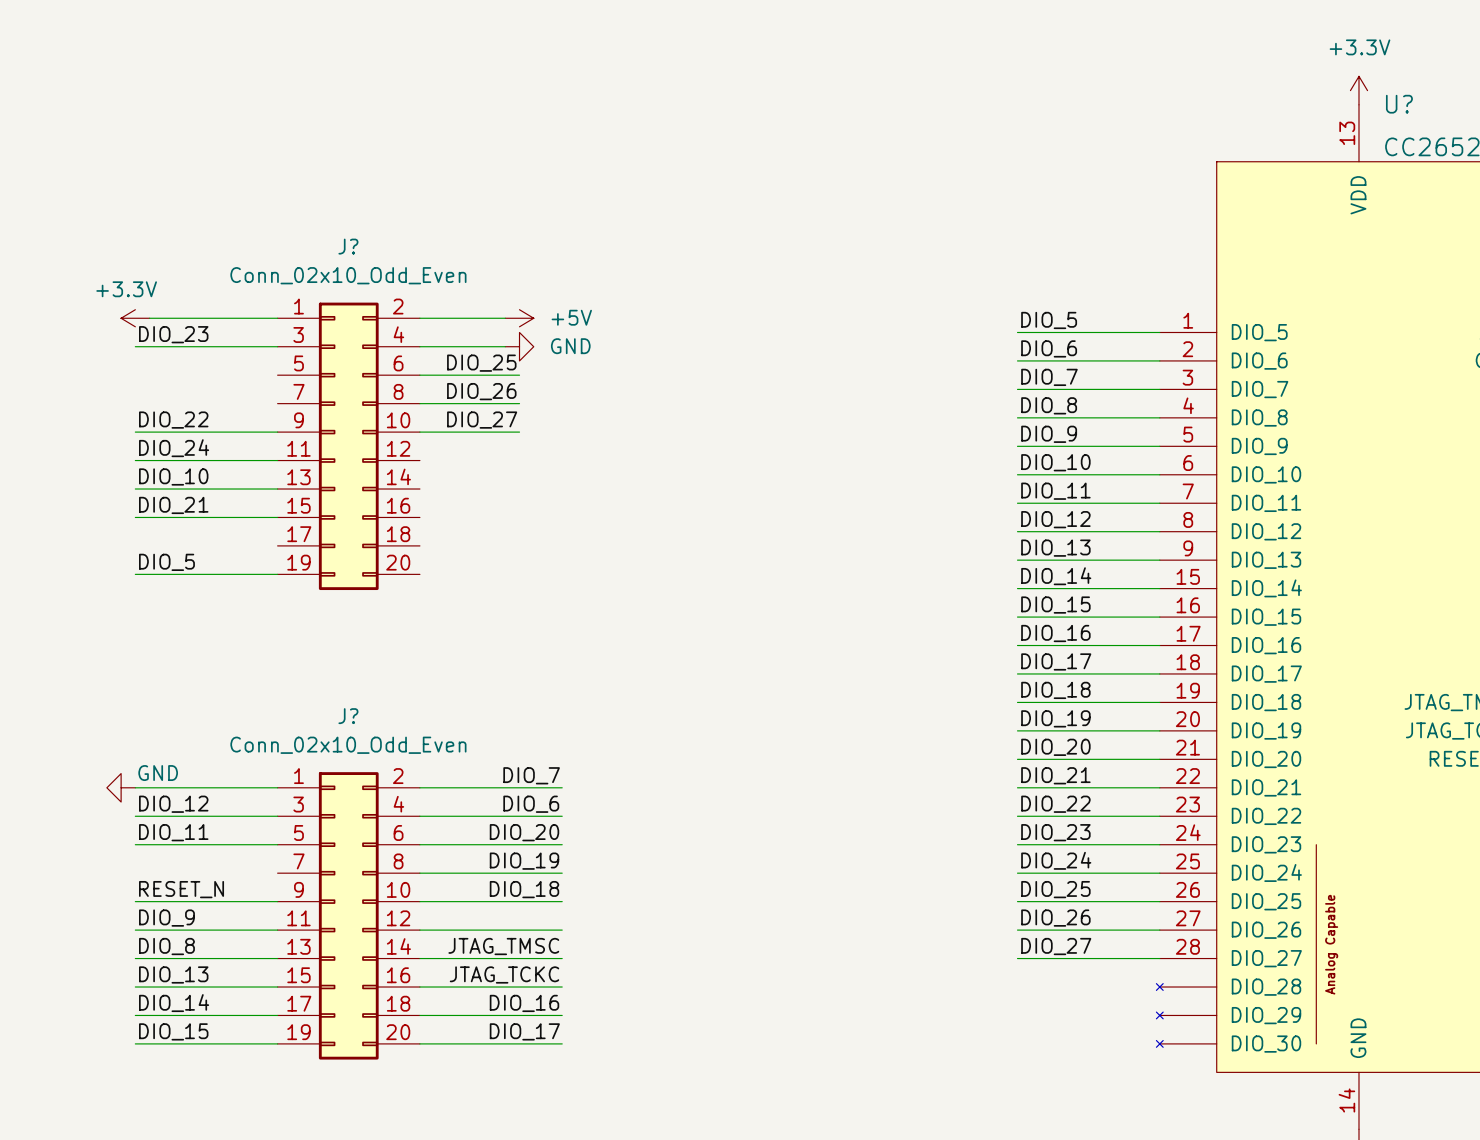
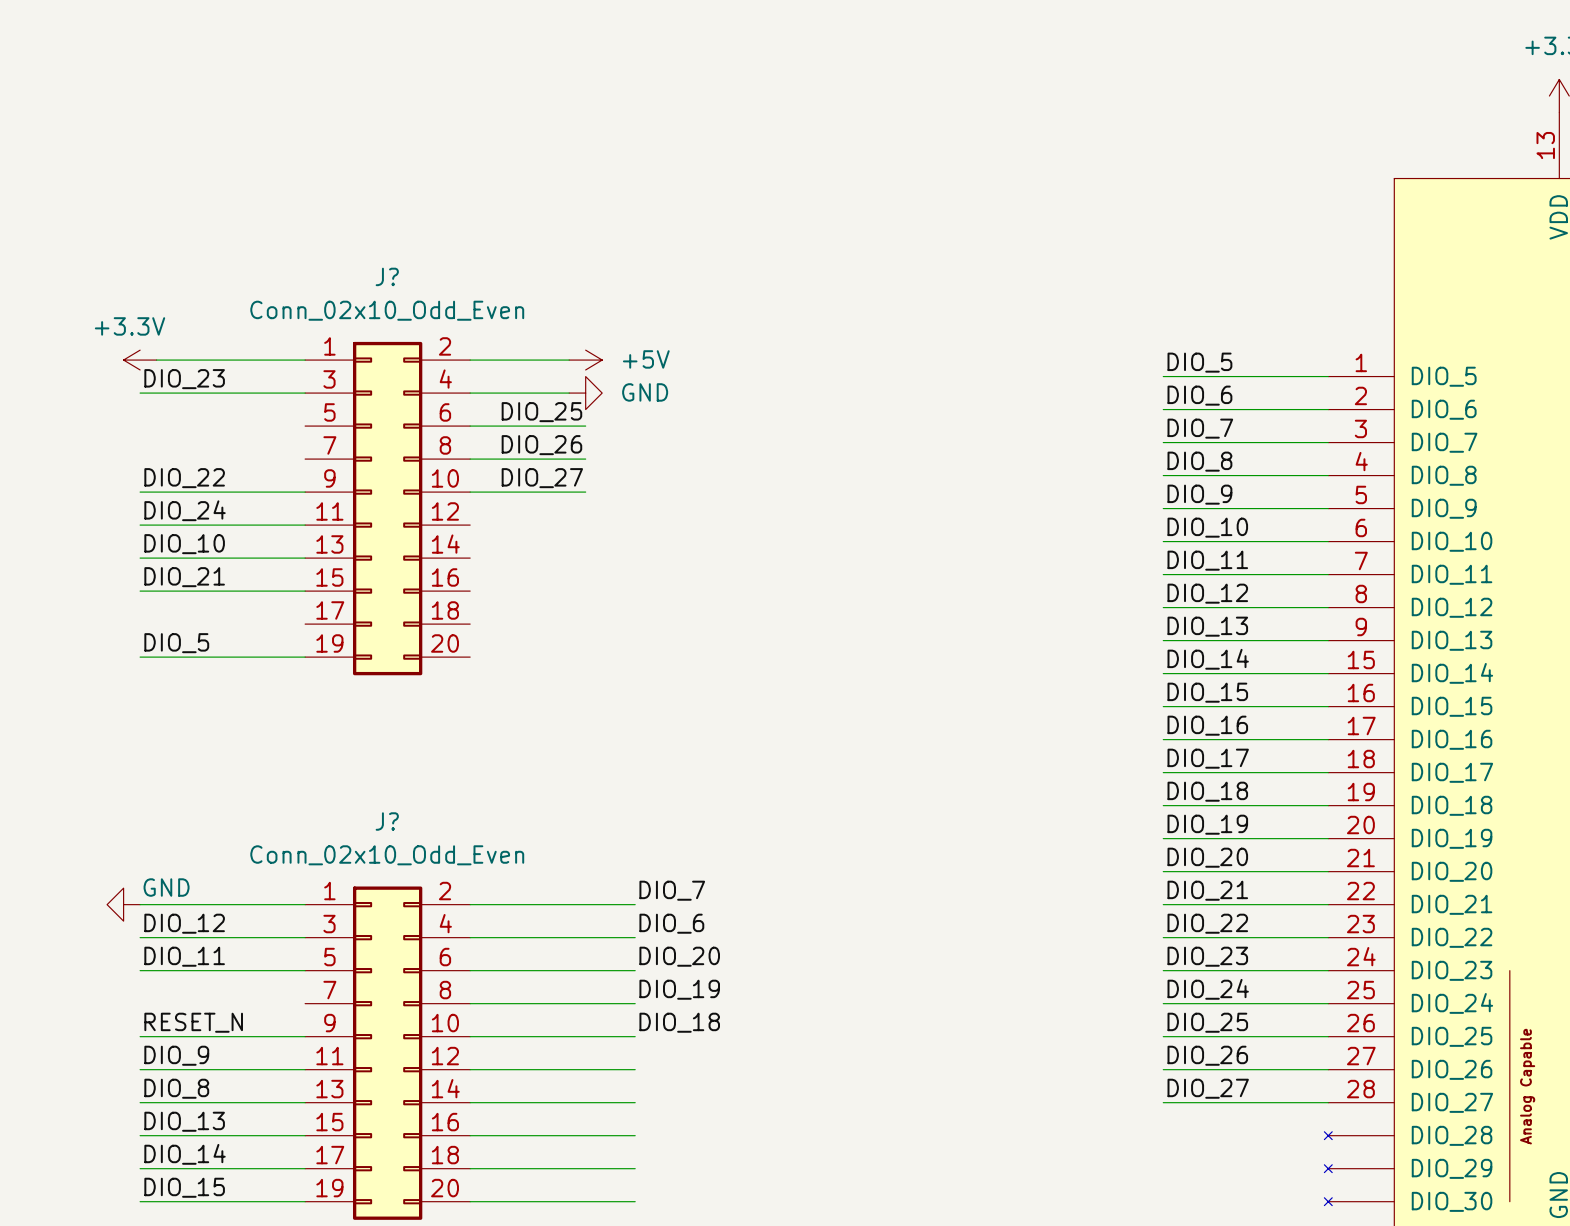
label position: DIO_7 (531, 775) -> DIO_7 (672, 890)
label position: DIO_6 (531, 804) -> DIO_6 (671, 923)
label position: DIO_20 (524, 832) -> DIO_20 (679, 956)
label position: DIO_19 (524, 861) -> DIO_19 (679, 989)
label position: DIO_18 (524, 889) -> DIO_18 (679, 1022)
label: JTAG_TMSC (503, 946) -> none
label: JTAG_TCKC (504, 974) -> none
label: DIO_16 (524, 1003) -> none
label: DIO_17 (524, 1031) -> none

